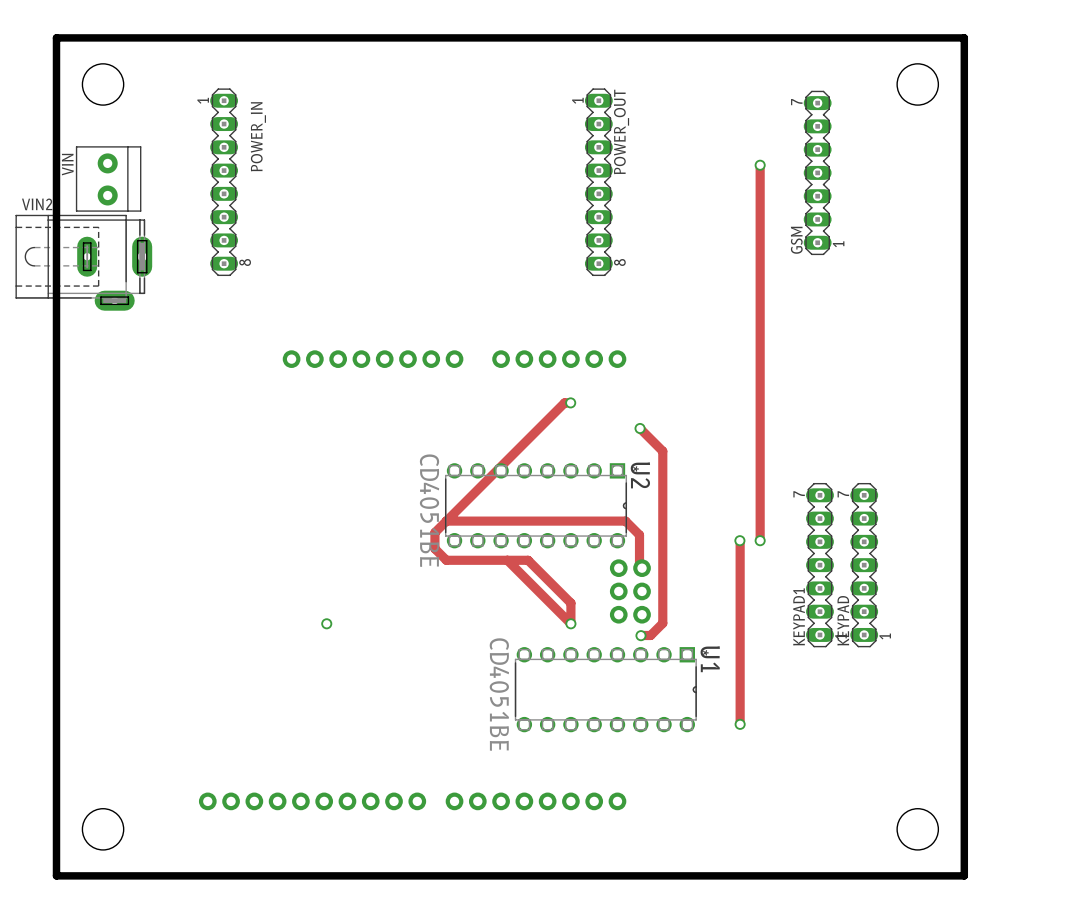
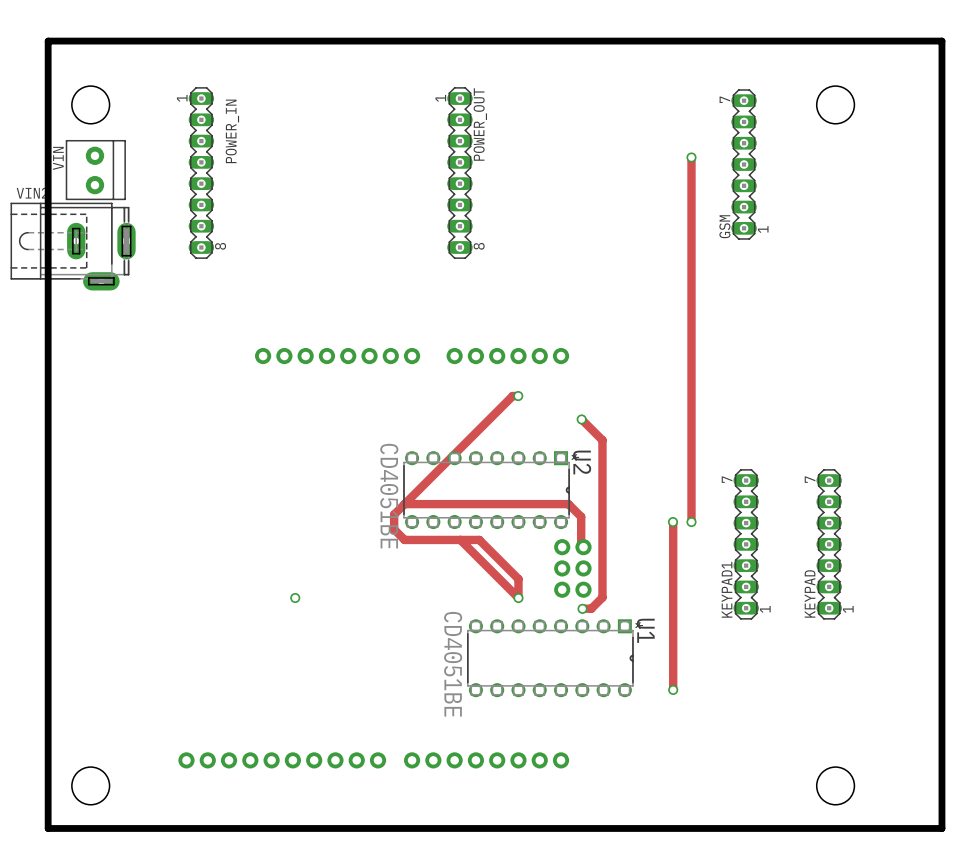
board edge: (56, 37) (964, 37) (964, 875) -> (48, 62) (48, 41) (941, 41) (941, 828) (878, 828)
track: none -> (691, 157) (691, 178)
via position: (760, 165) -> (691, 157)
GSM position: (817, 172) -> (744, 164)
VIN position: (108, 178) -> (95, 170)
POWER_IN position: (224, 182) -> (201, 173)
POWER_OUT position: (598, 182) -> (459, 173)
VIN2 position: (83, 262) -> (73, 246)
KEYPAD position: (864, 565) -> (829, 544)

